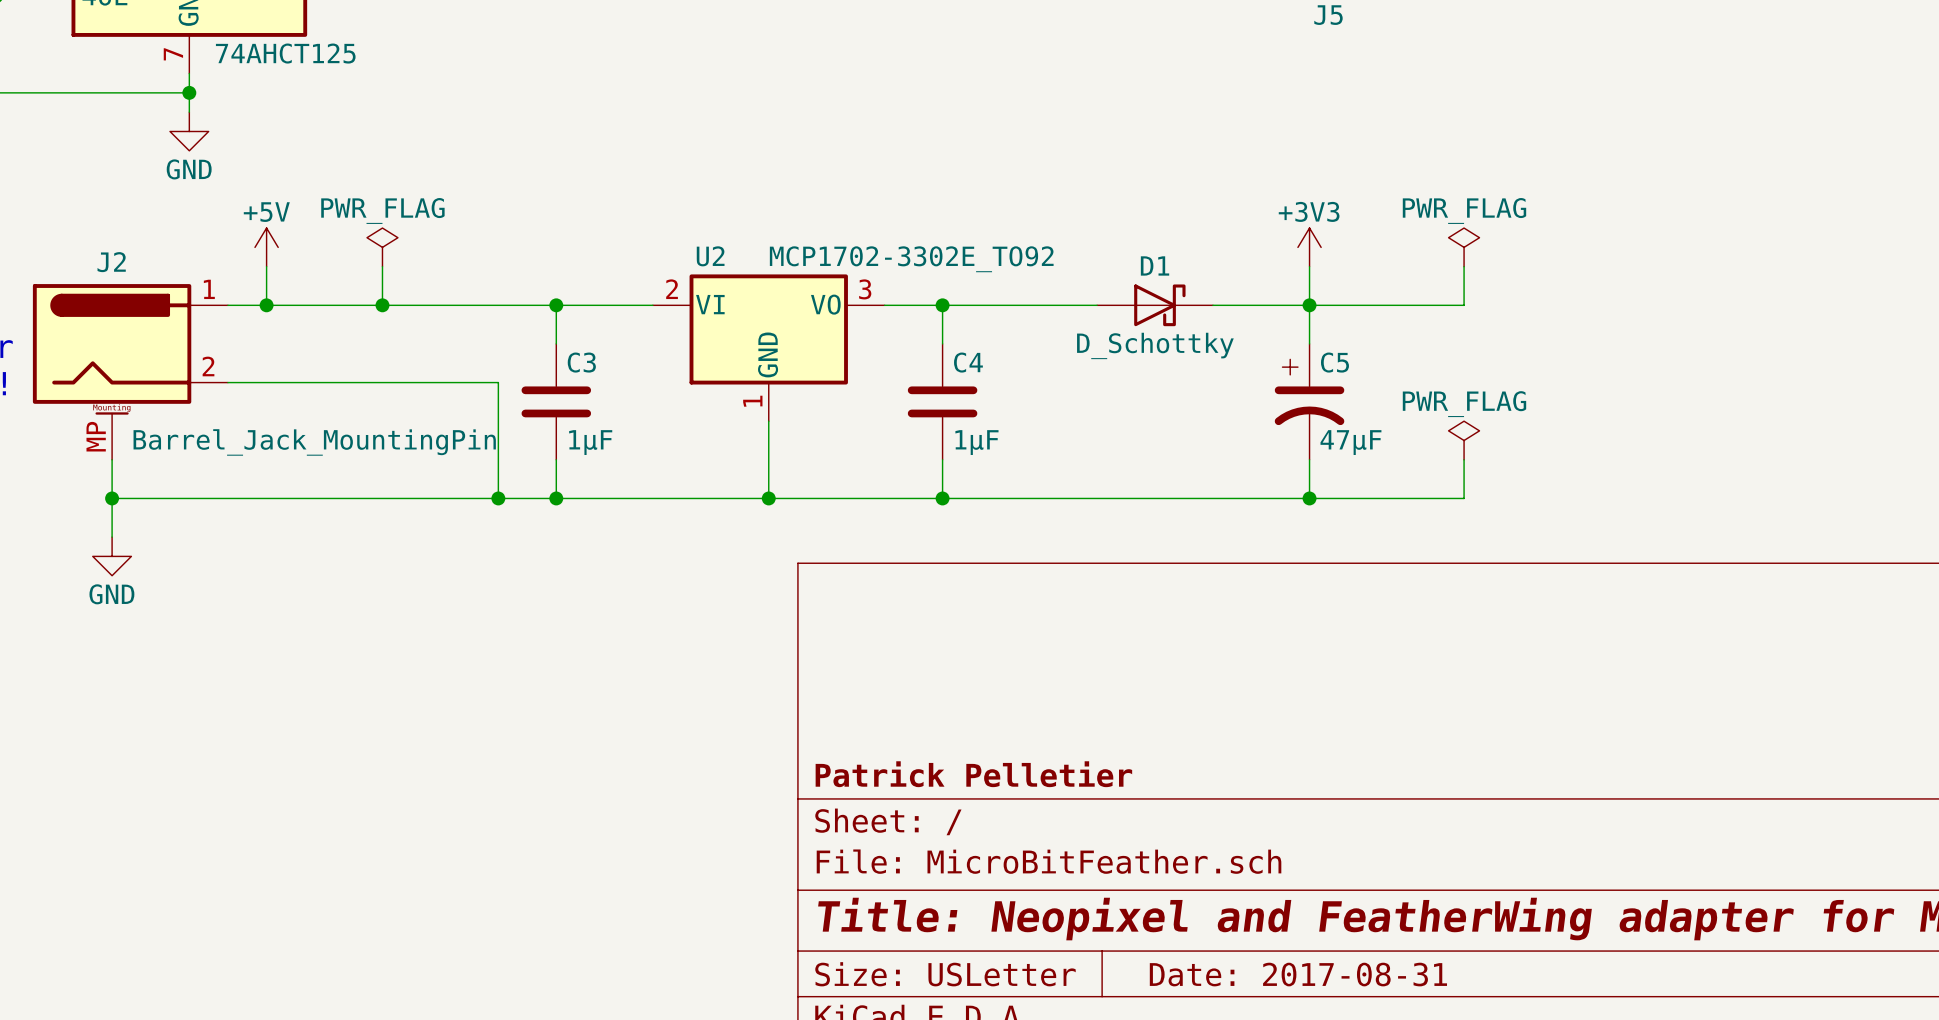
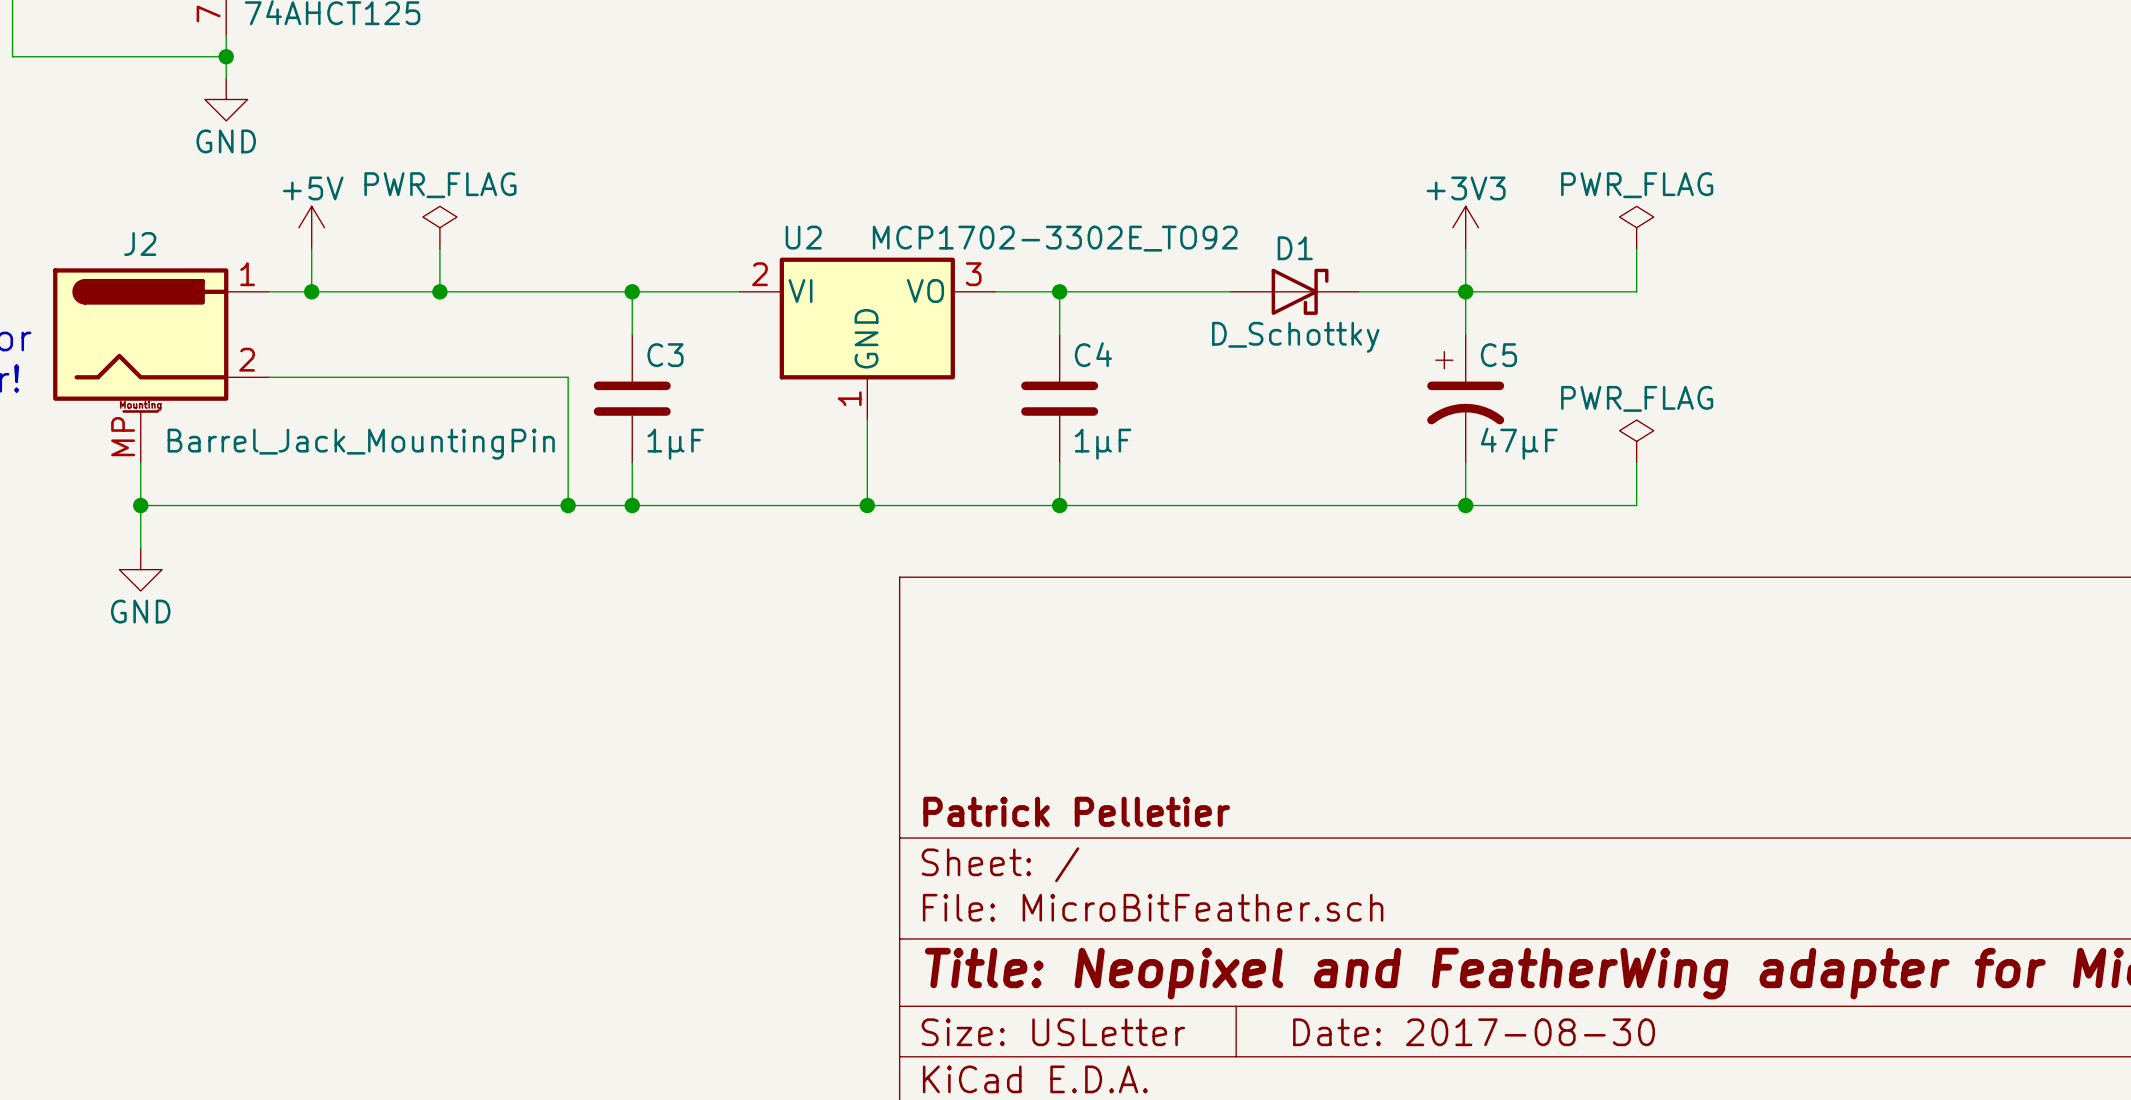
title block: Date: 2017-08-31 (1298, 974) -> Date: 2017-08-30 (1474, 1032)

